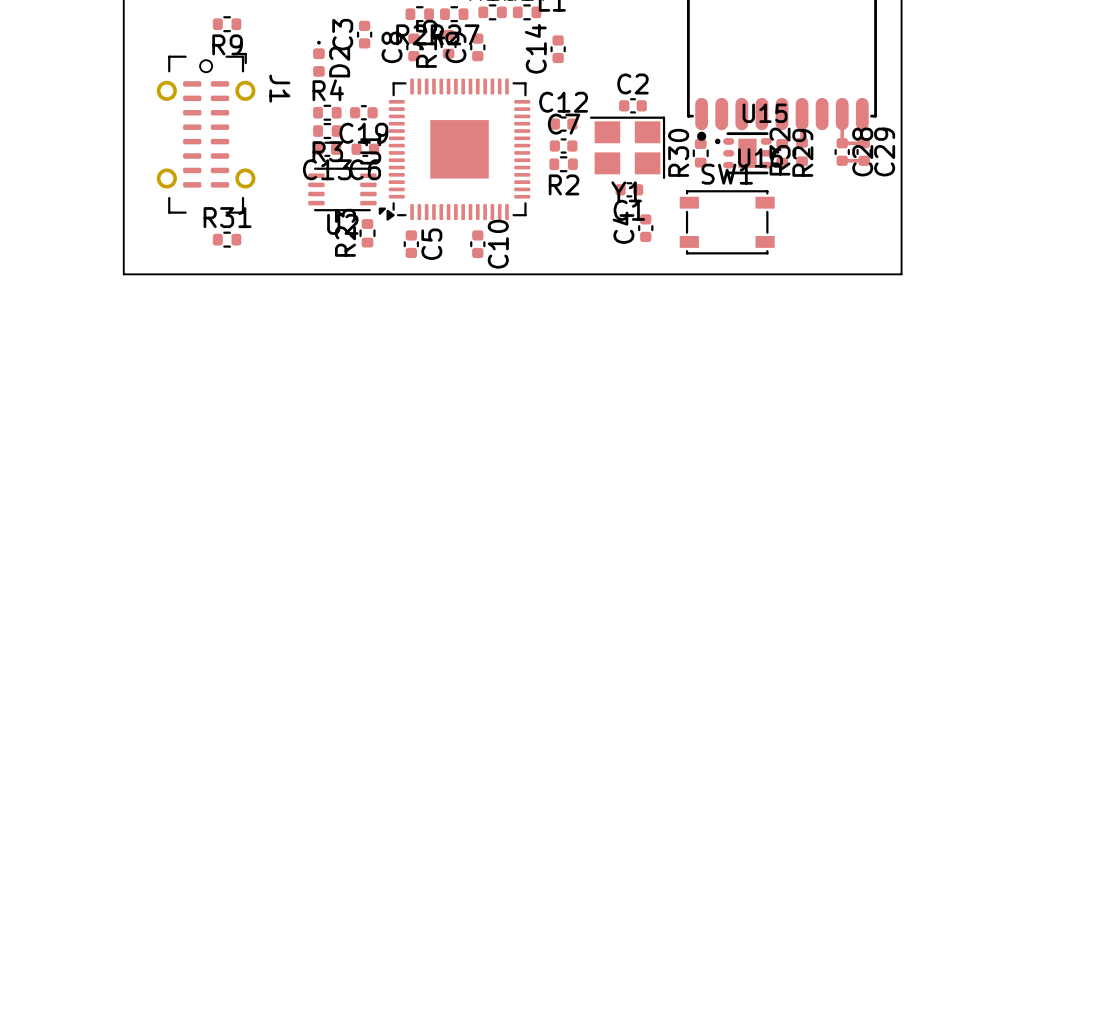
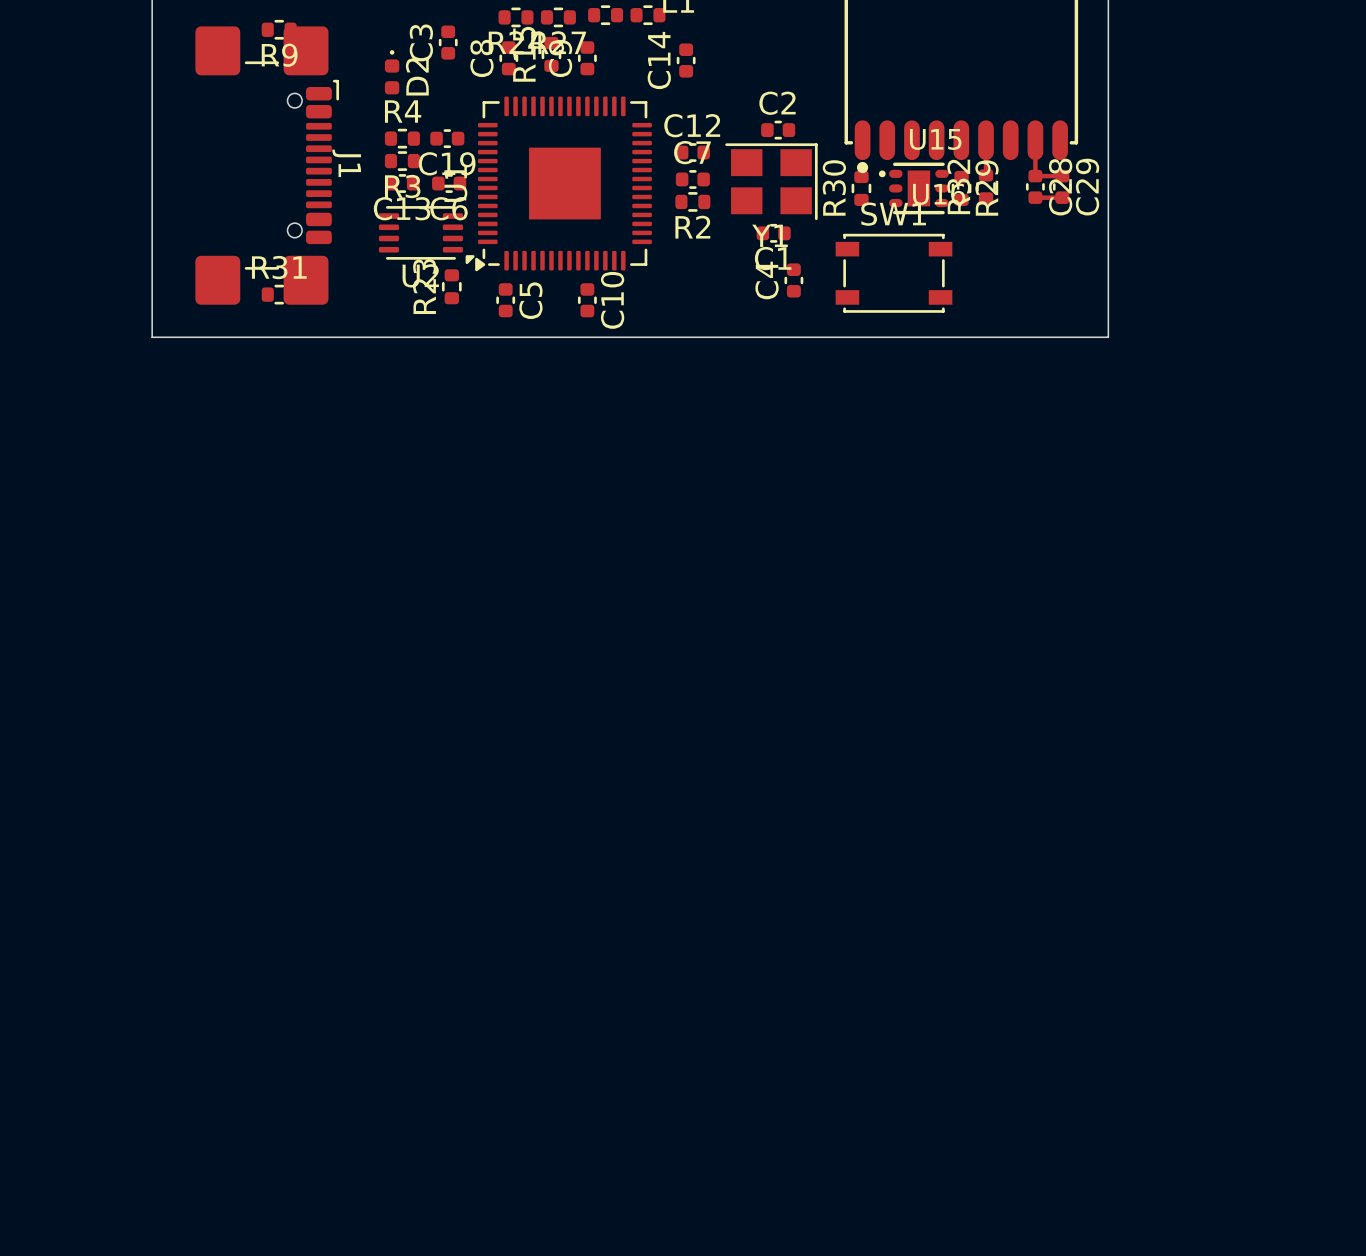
J1 footprint: [156, 52, 256, 214] -> [195, 26, 340, 305]
J1 name position: J1 (279, 88) -> J1 (346, 163)

